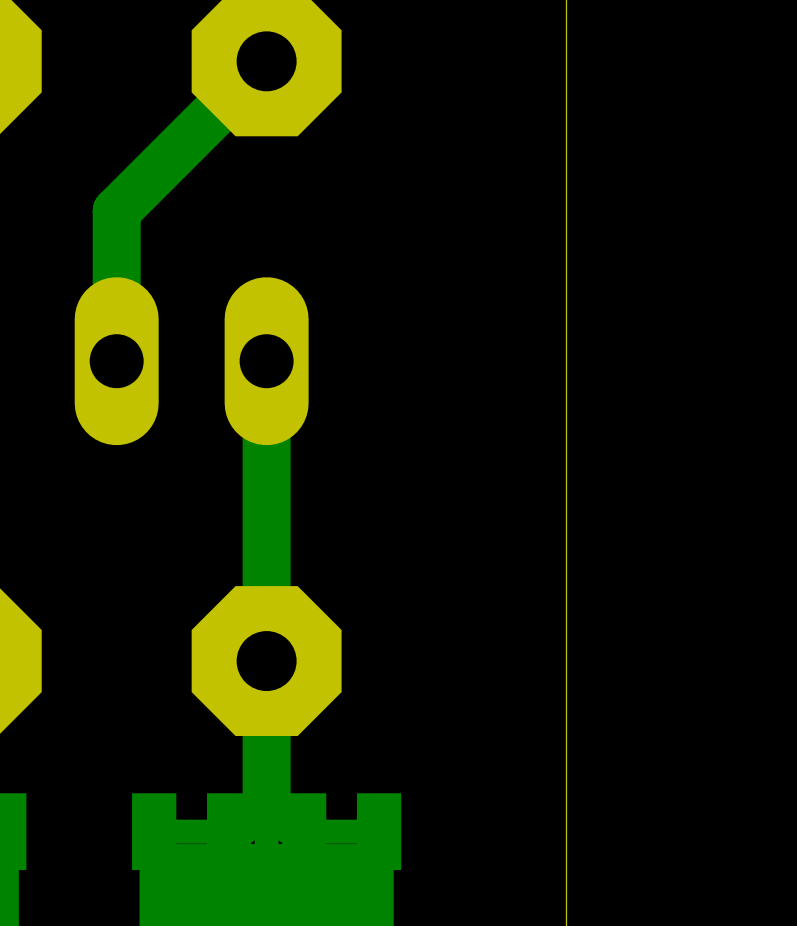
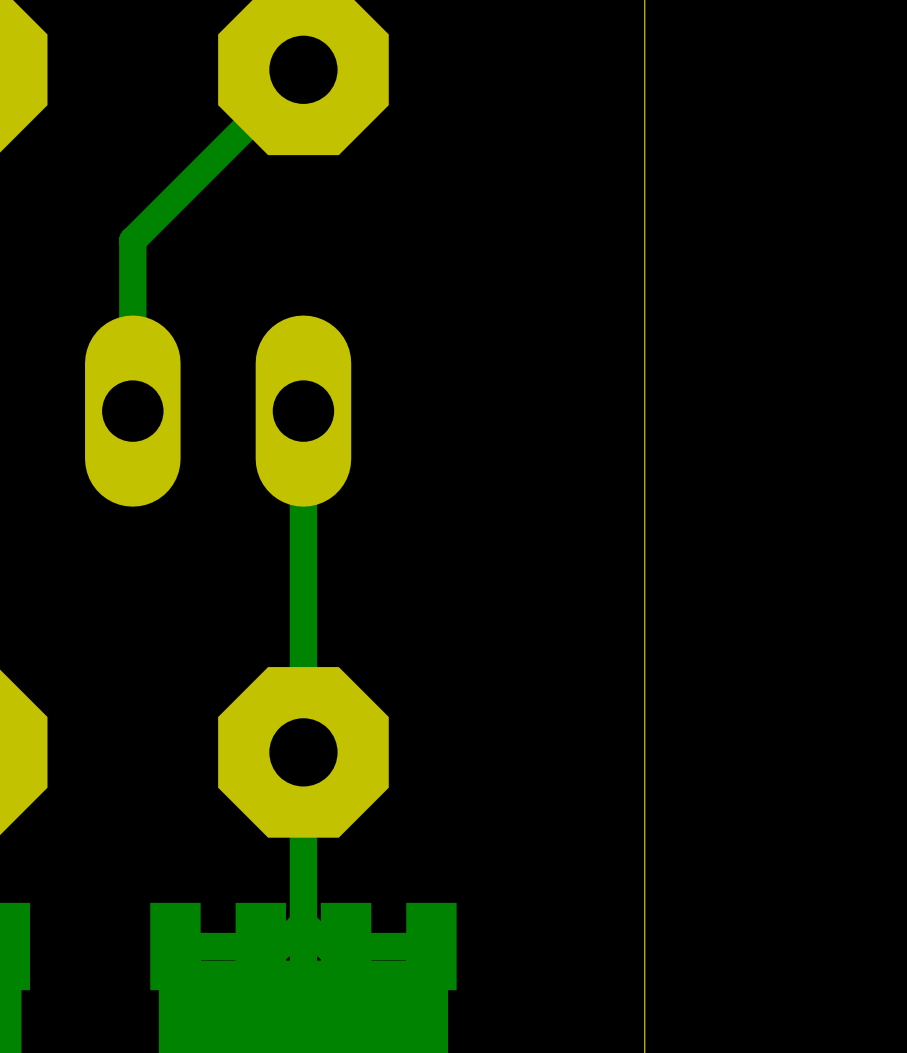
track width: thick (266, 61) (116, 211) (116, 361) -> thin (303, 69) (132, 240) (132, 411)
track width: thick (266, 361) (266, 810) -> thin (303, 411) (303, 923)

